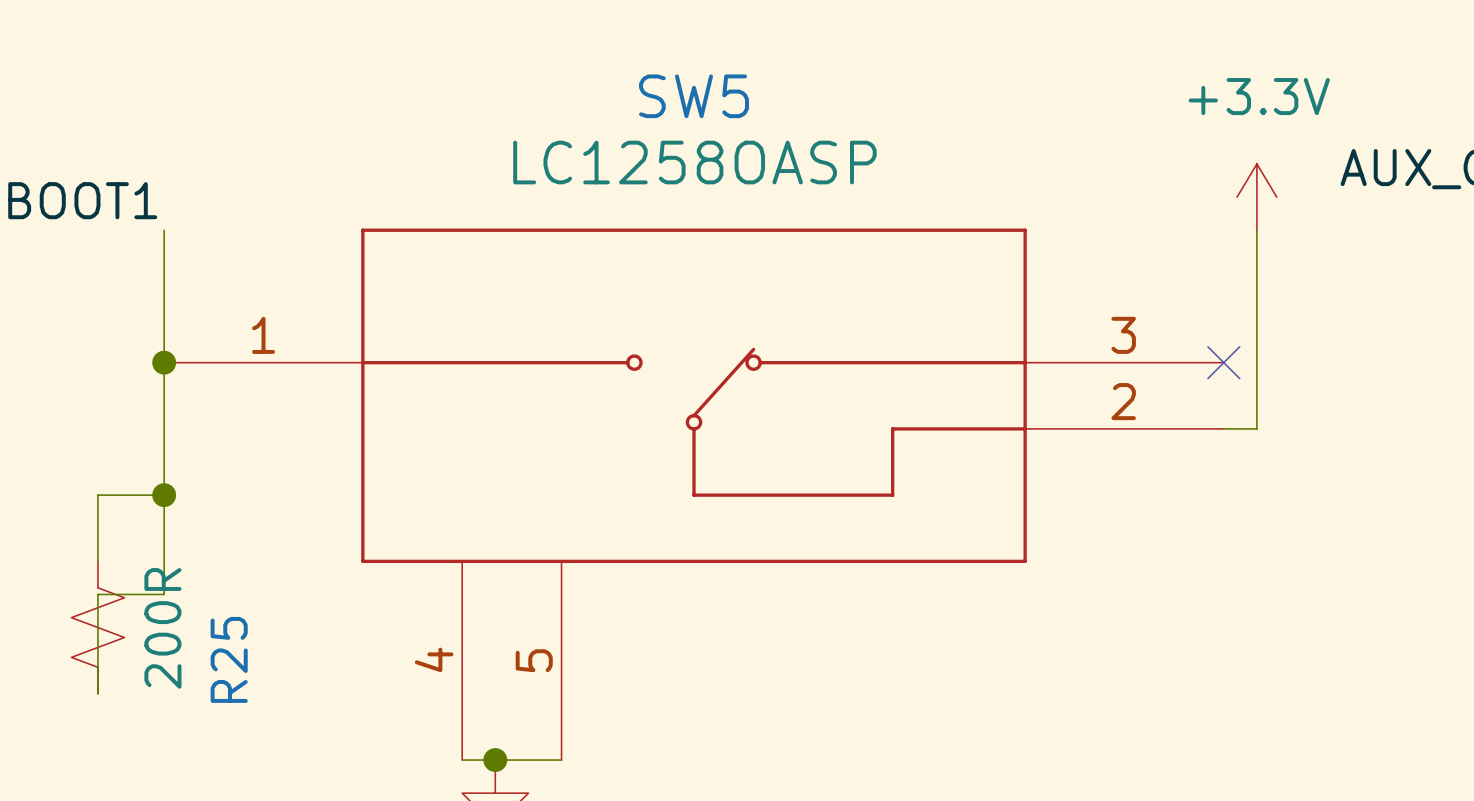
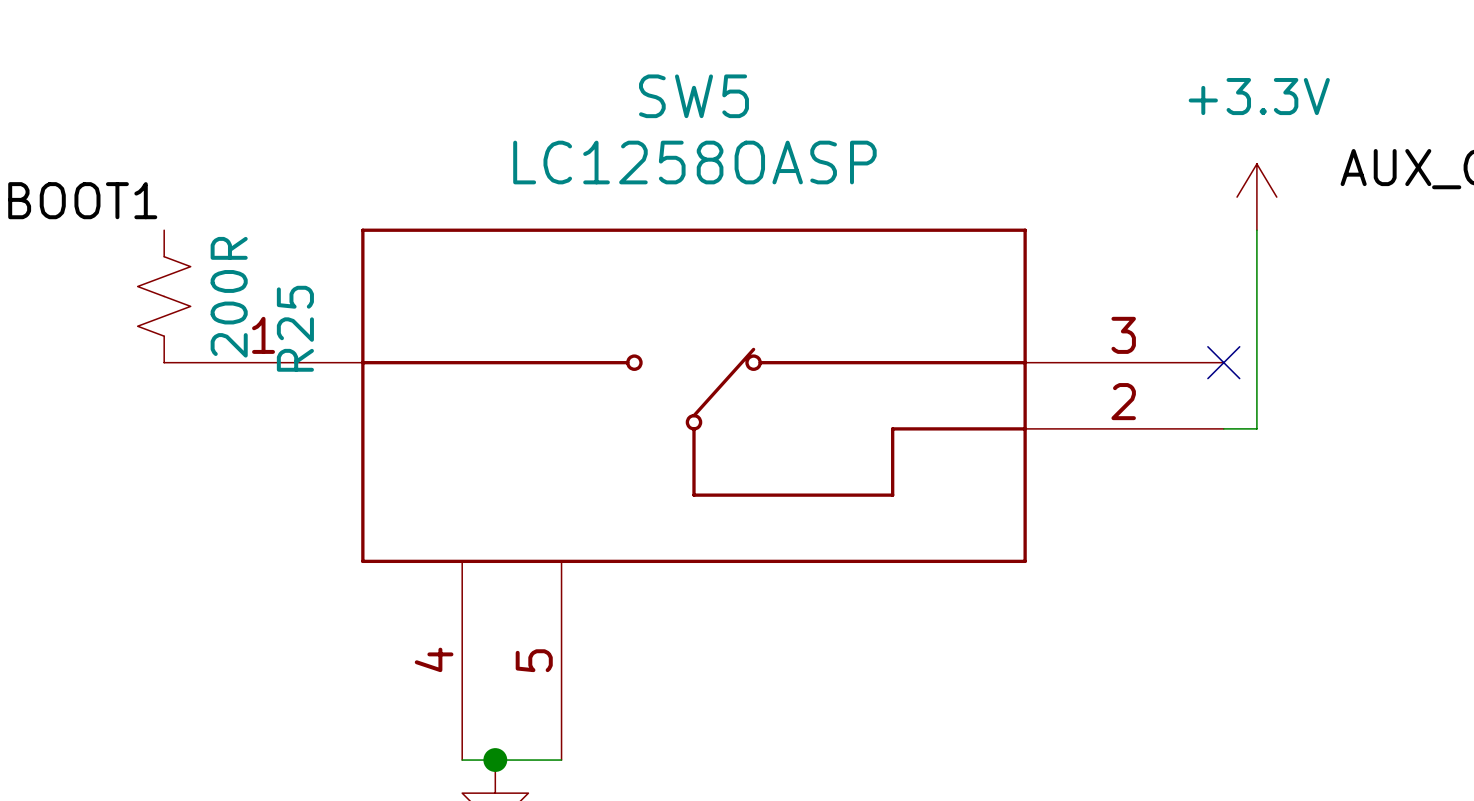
wire: (164, 230) (164, 594) (97, 594) (97, 693) -> none
junction: (164, 362) -> none
wire: (164, 495) (97, 495) (97, 561) -> none
junction: (164, 495) -> none
R25 position: (97, 627) -> (164, 296)

